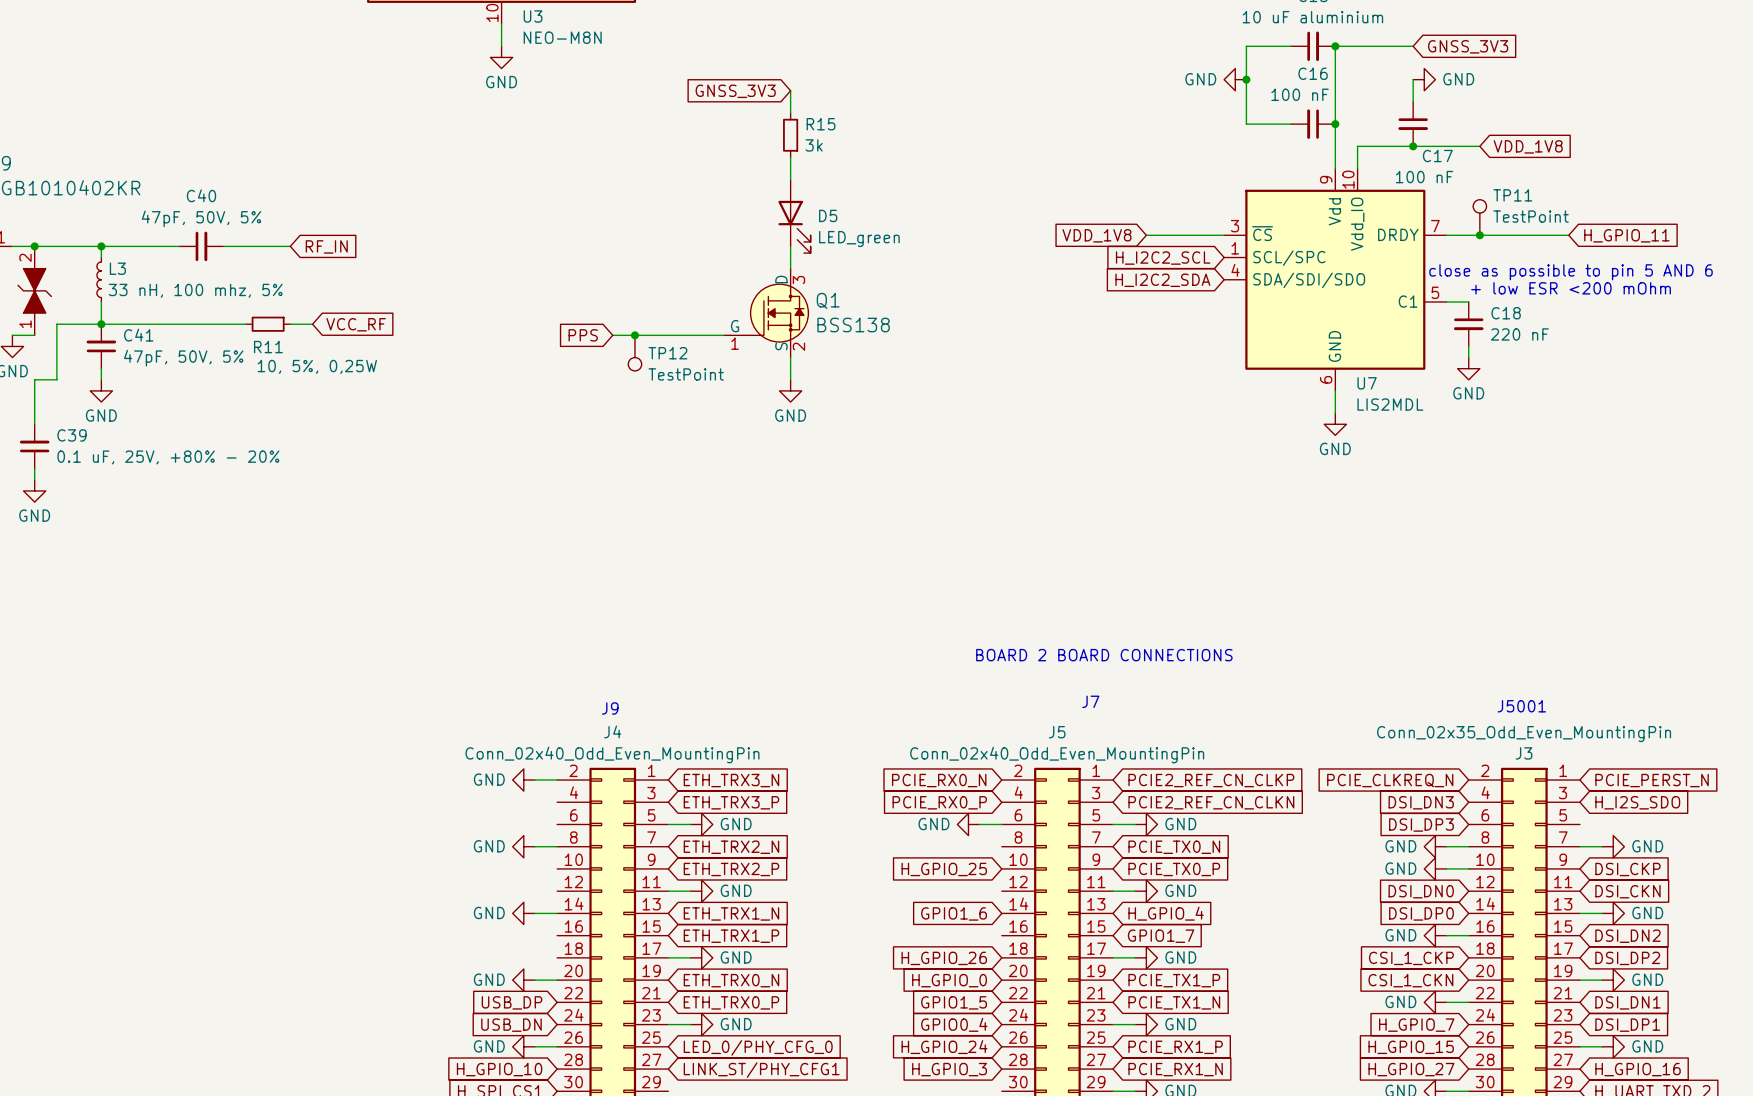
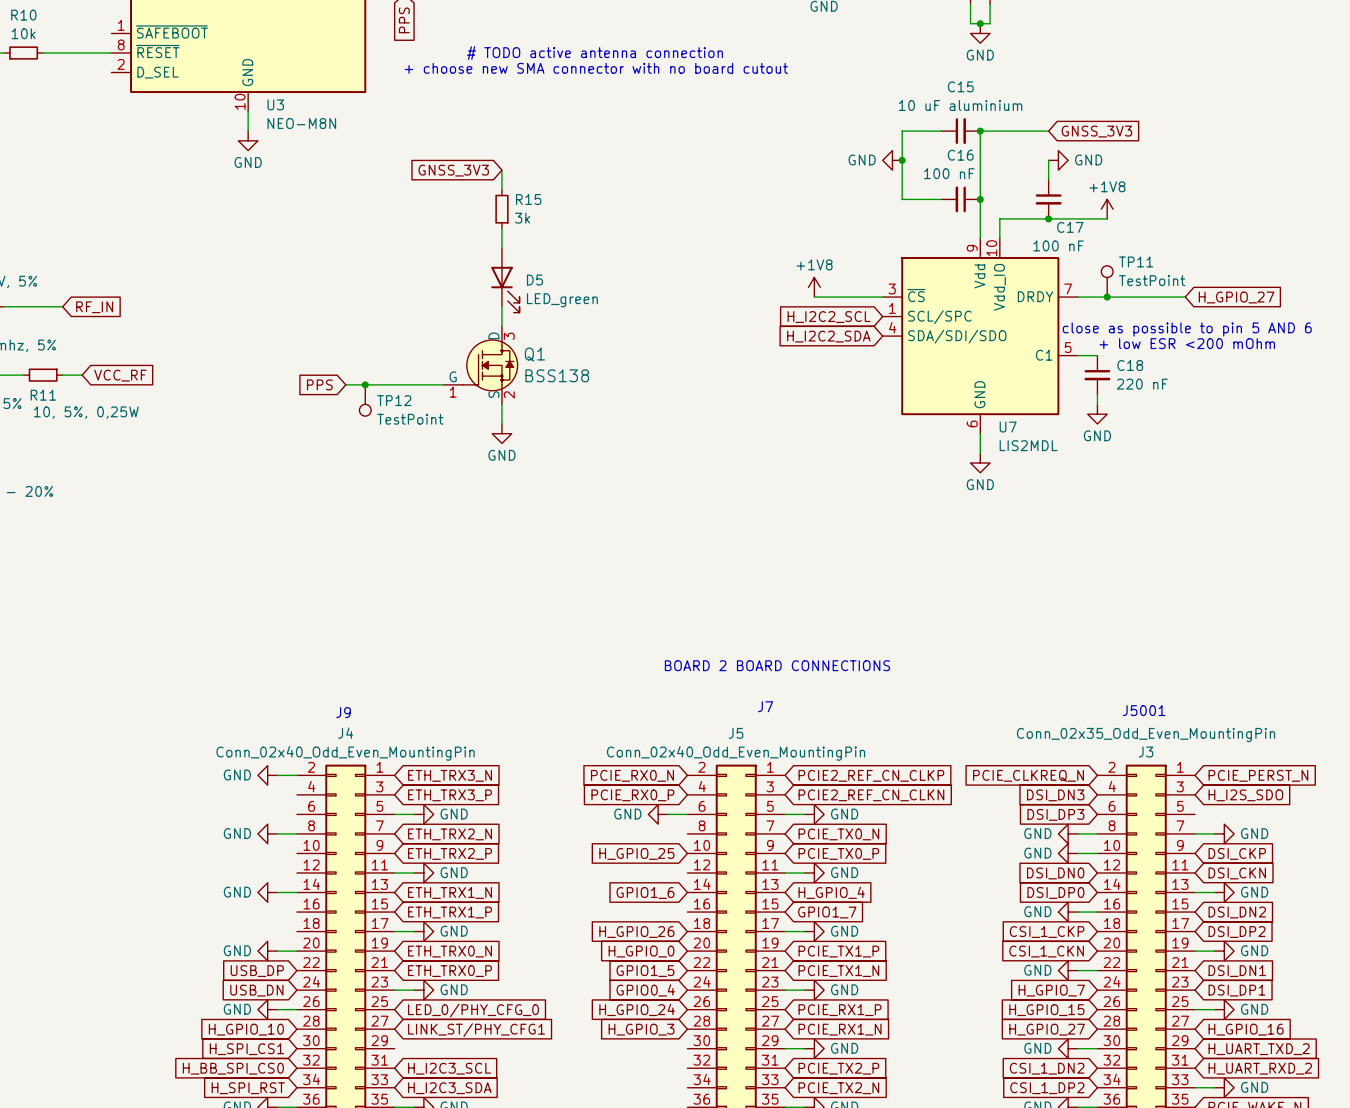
power symbol: none -> +1V8 (1107, 209)
global label: VDD_1V8 (1528, 146) -> none
power symbol: none -> +1V8 (814, 287)
global label: VDD_1V8 (1096, 235) -> none
global label: H_GPIO_11 (1626, 235) -> H_GPIO_27 (1236, 297)

